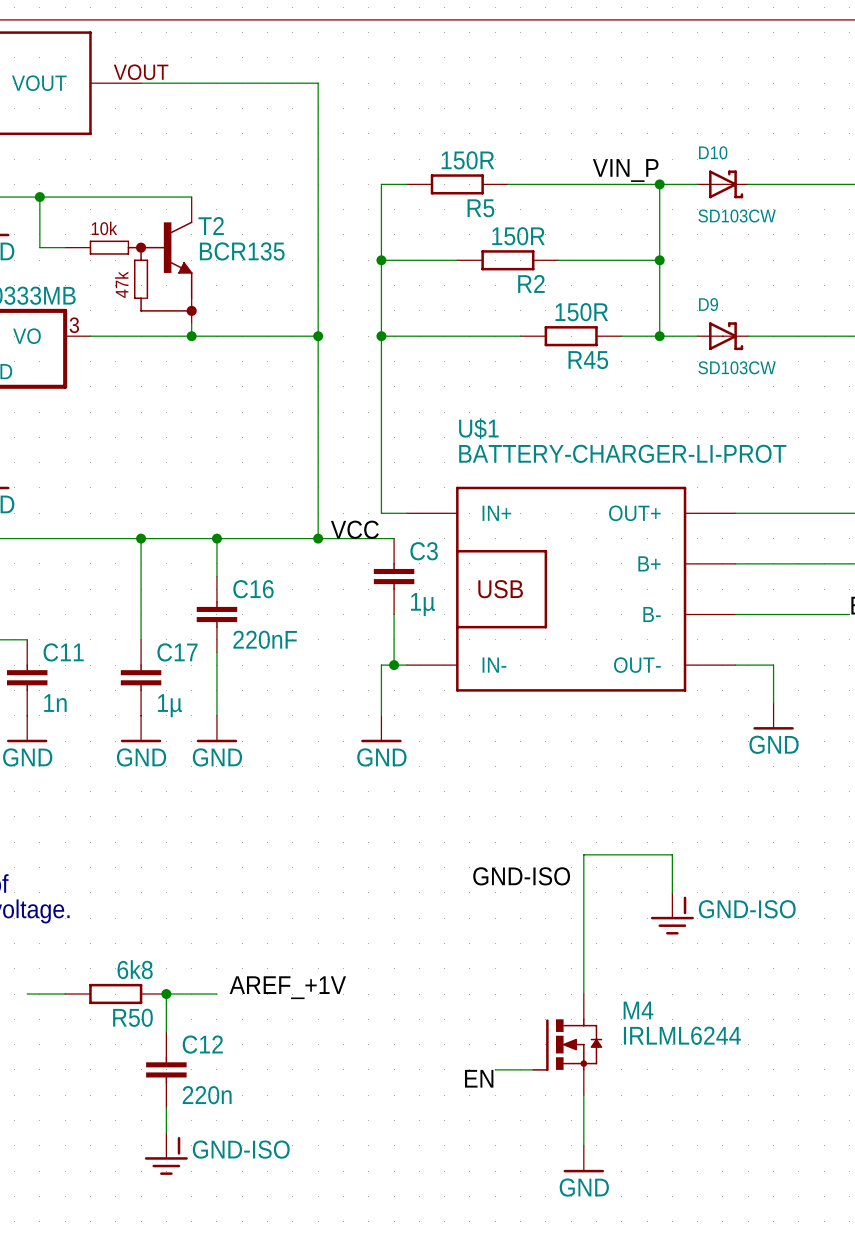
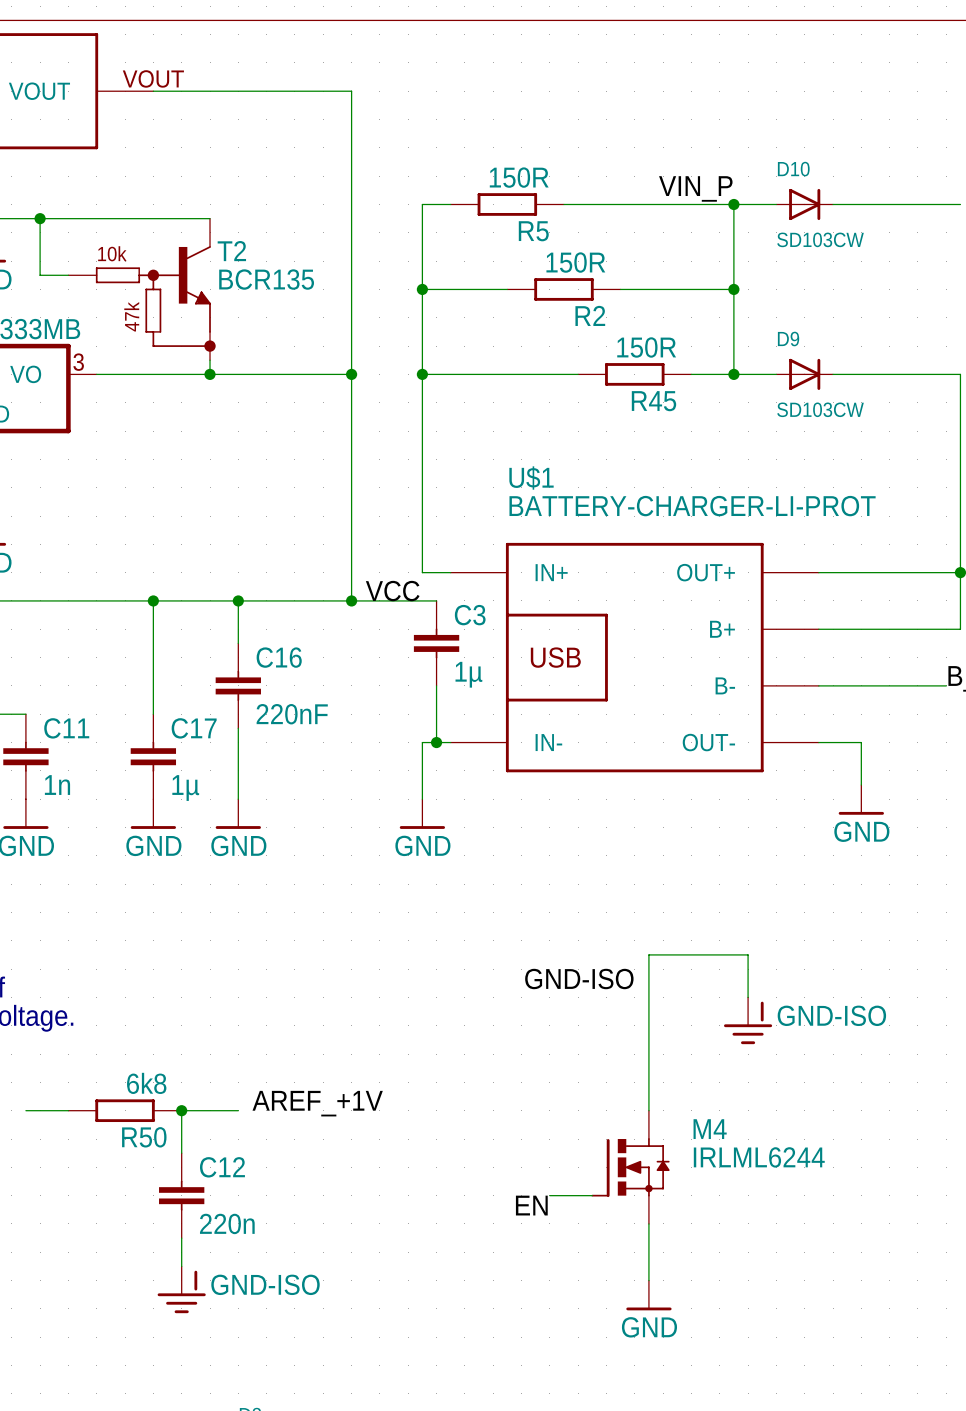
D10 symbol: [697, 170, 749, 199] -> [776, 188, 834, 221]
D9 symbol: [697, 322, 749, 351] -> [776, 358, 834, 390]

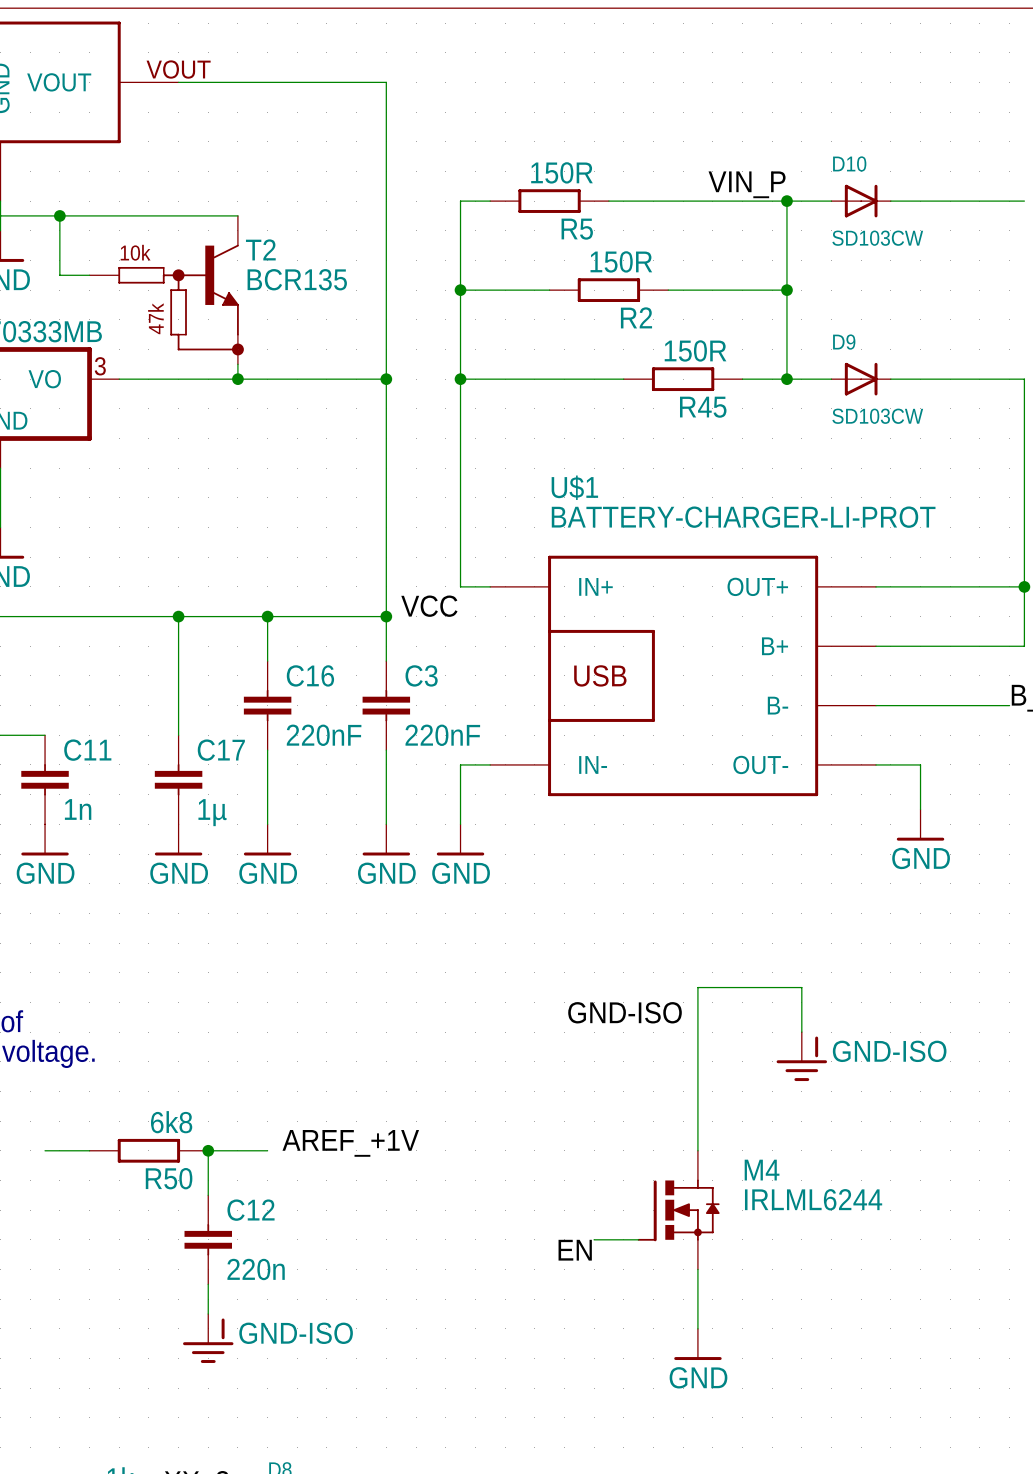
wire: (351, 600) (436, 600) -> (386, 616) (386, 661)
C3 position: (436, 643) -> (386, 705)
C3 value: 1µ (468, 674) -> 220nF (442, 735)
wire: (436, 685) (436, 742) -> none
wire: none -> (386, 750) (386, 824)
junction: (436, 742) -> none
power symbol: none -> GND (386, 839)

